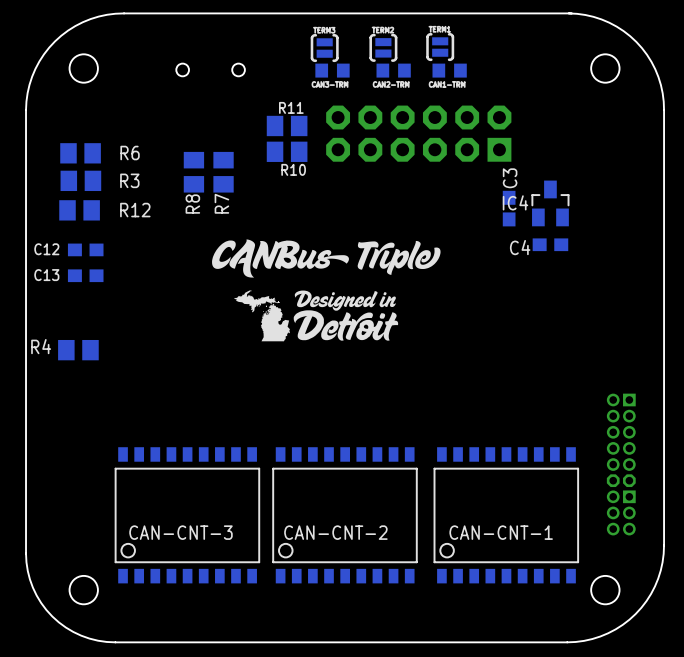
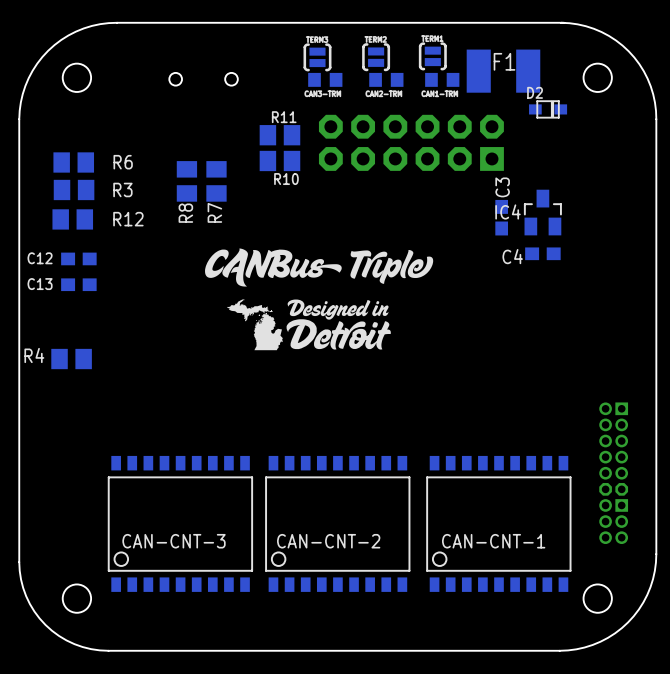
F1: none -> (503, 71)
D2: none -> (548, 109)

